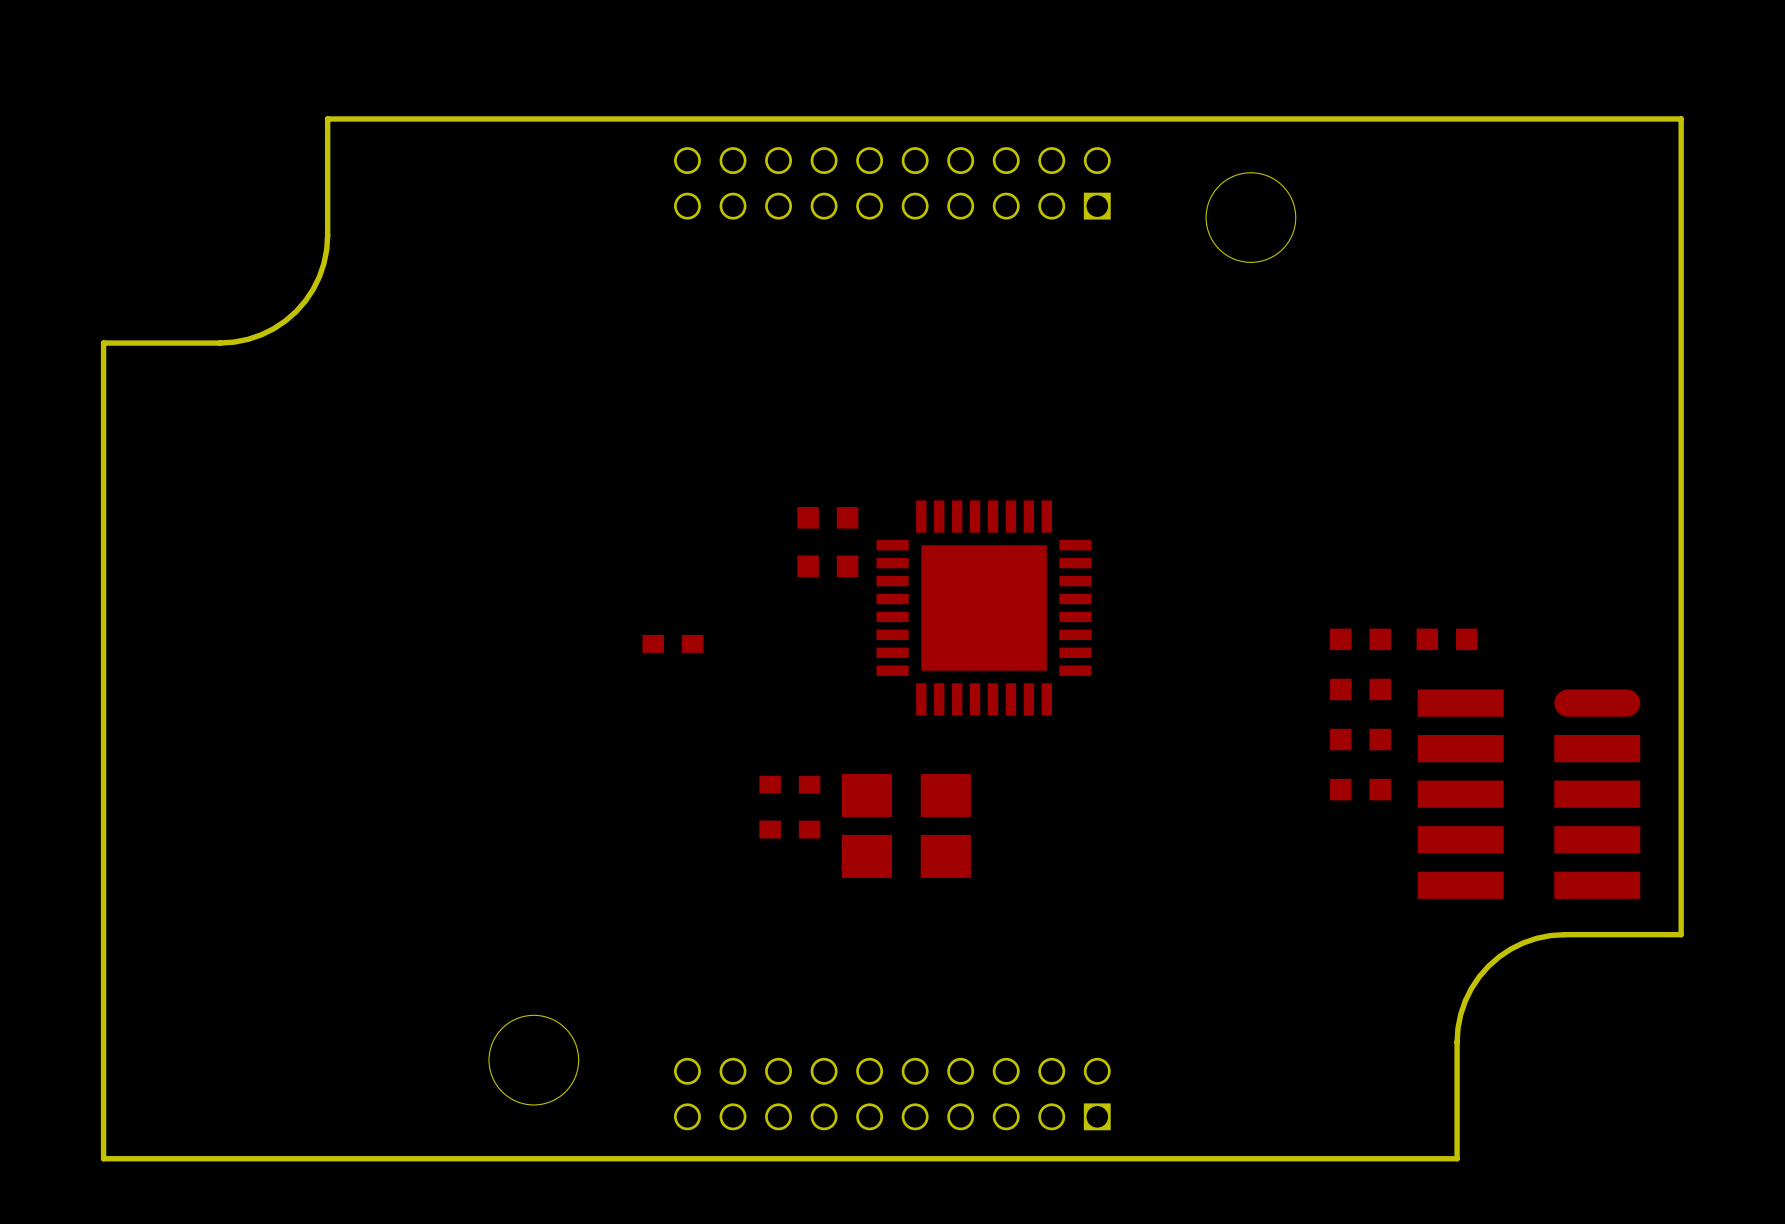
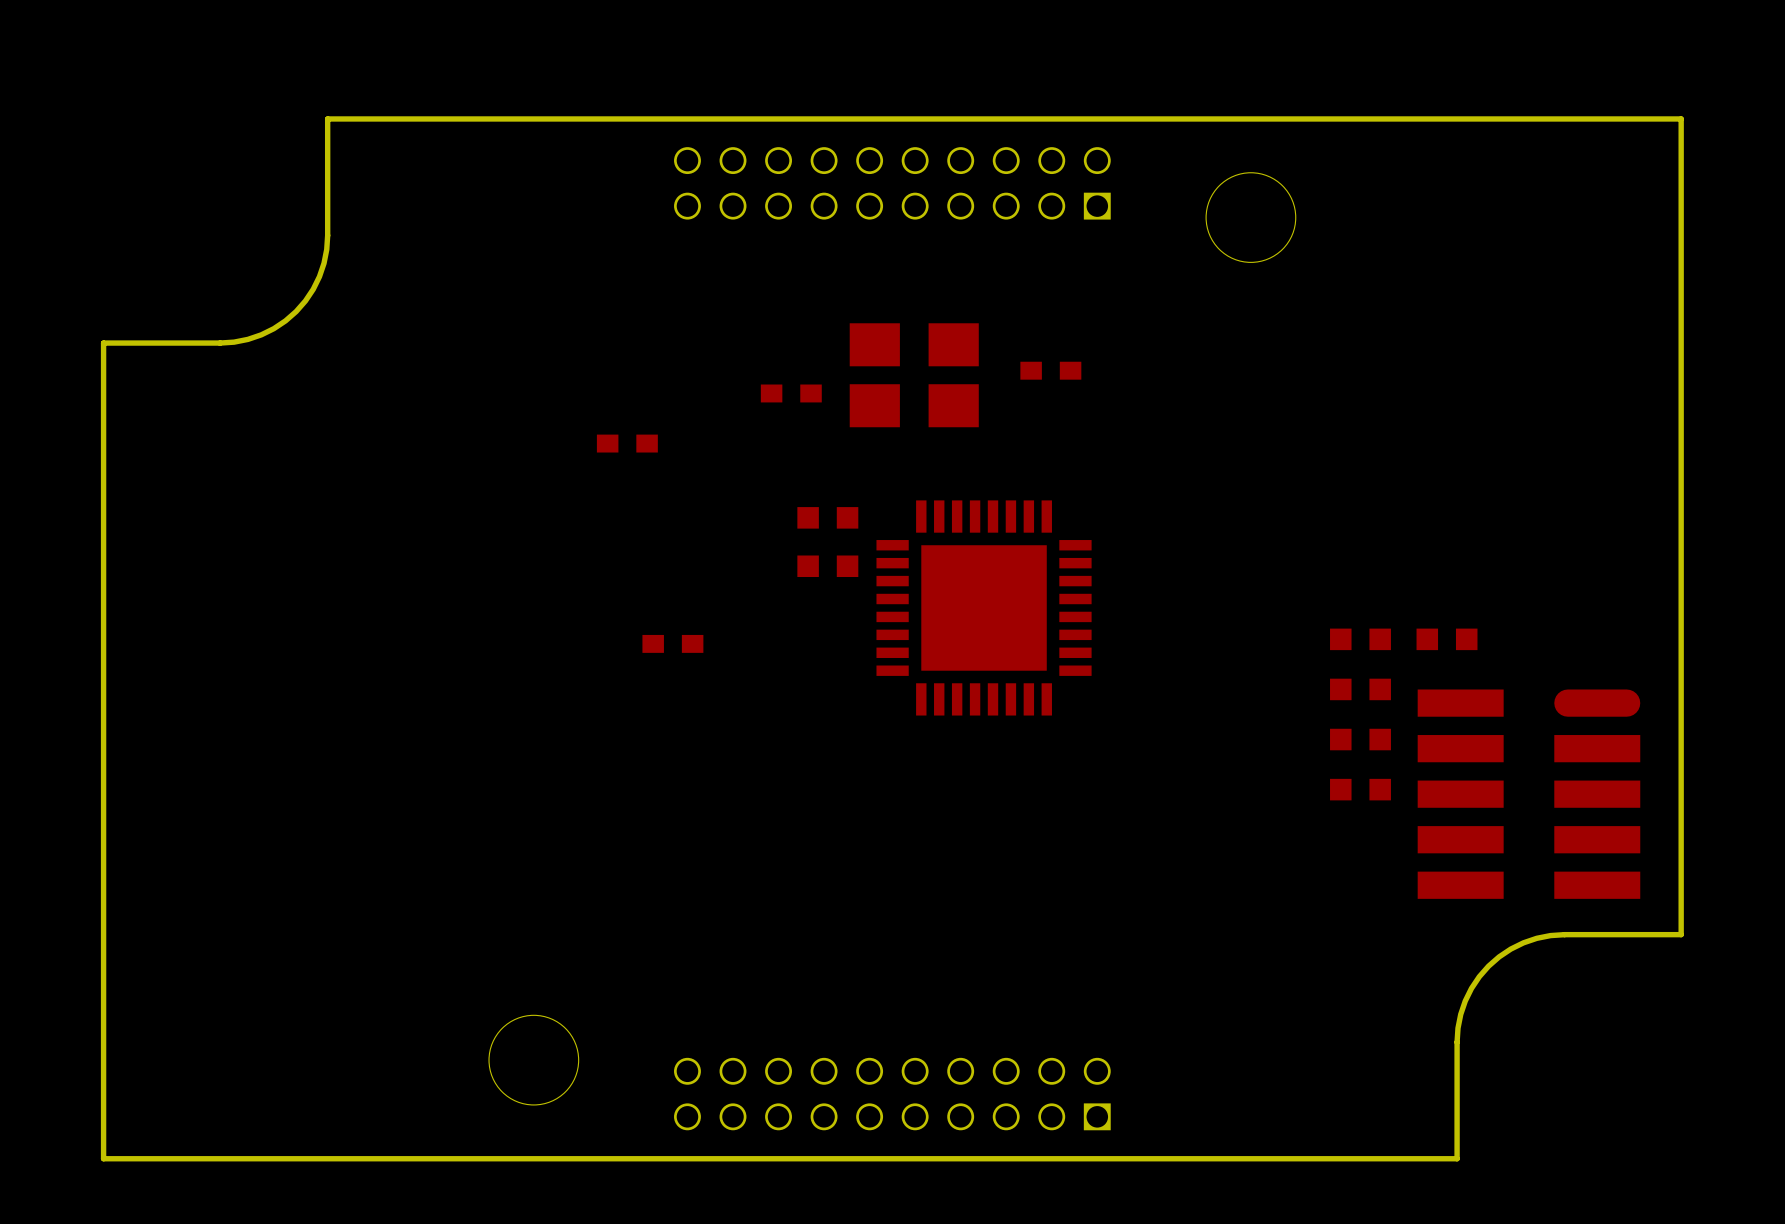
part: none -> (1050, 370)
part: none -> (791, 393)
part: none -> (627, 443)
part: (789, 784) -> none
part position: (906, 825) -> (914, 375)
part: (789, 829) -> none

